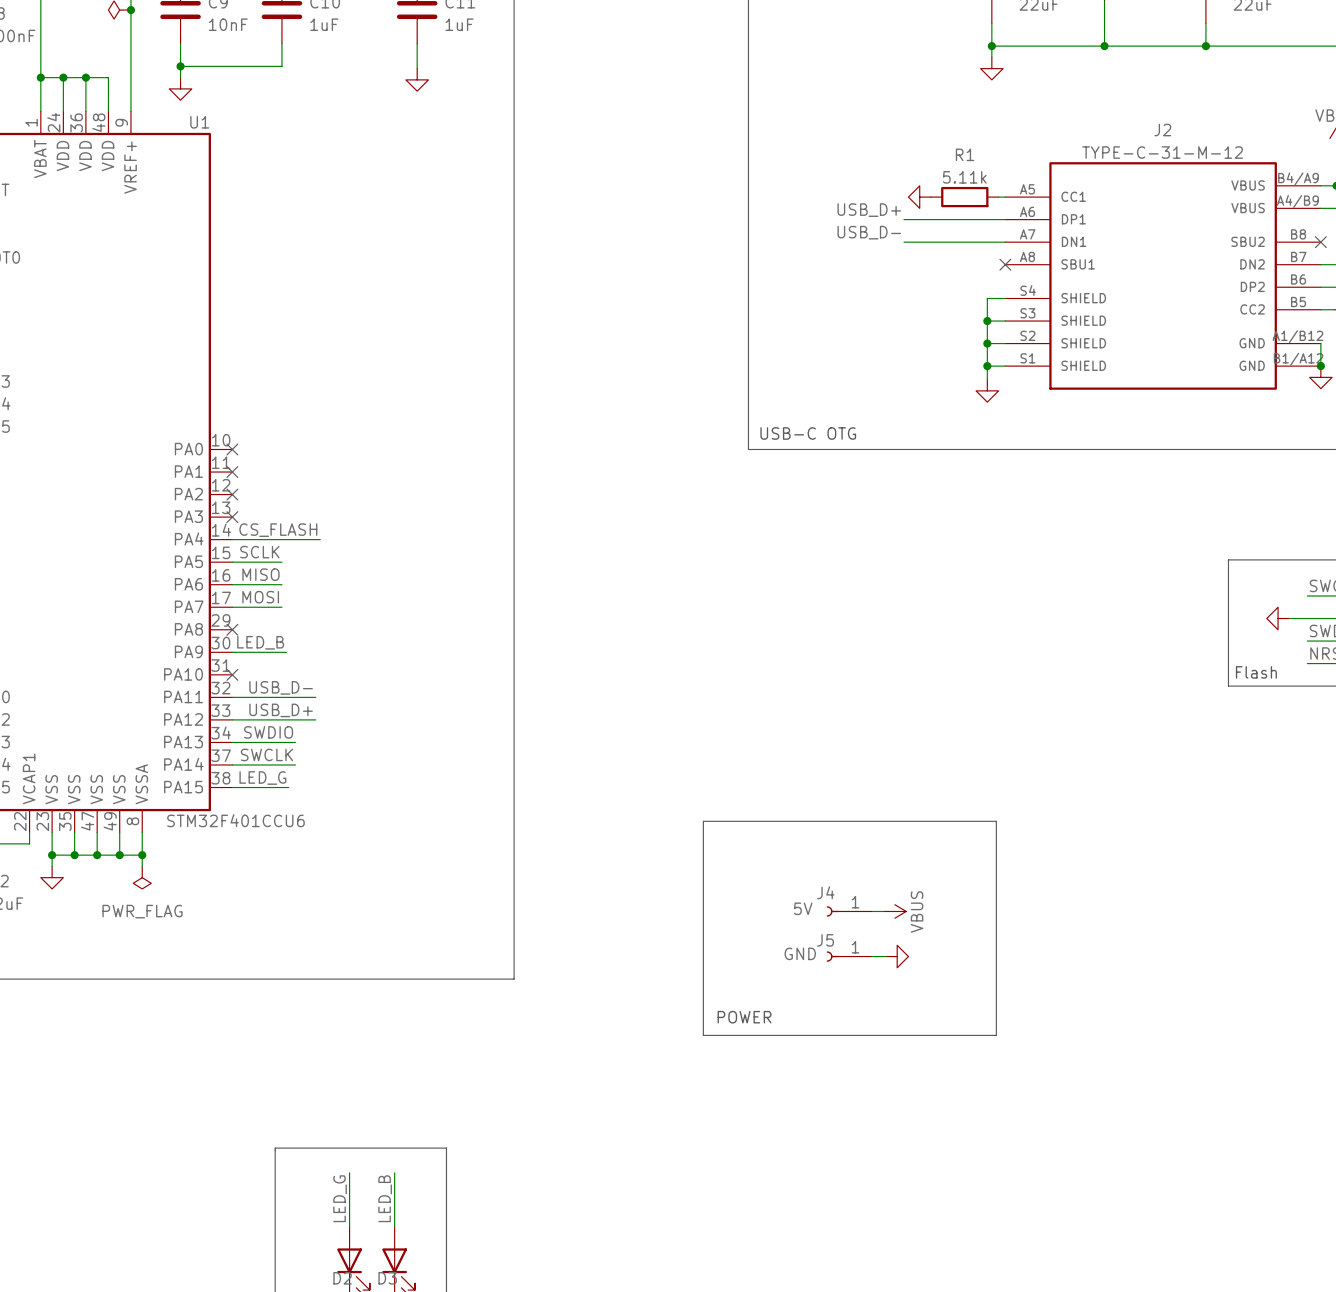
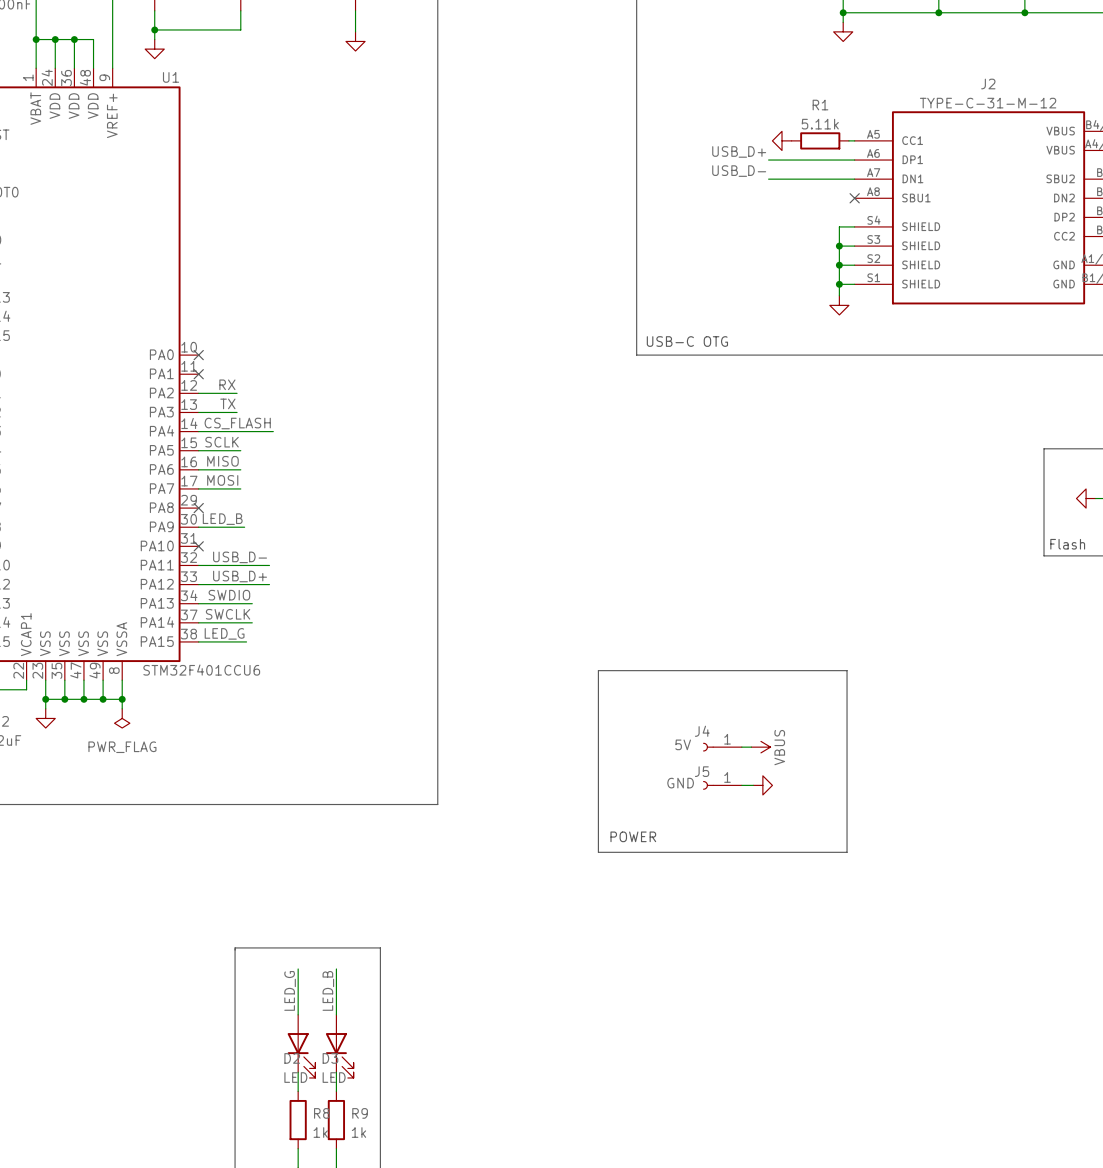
label: none -> RX (227, 384)
wire: none -> (198, 393) (237, 393)
no-connect mark: (232, 494) -> none
label: none -> TX (227, 403)
wire: none -> (198, 412) (237, 412)
no-connect mark: (232, 517) -> none

